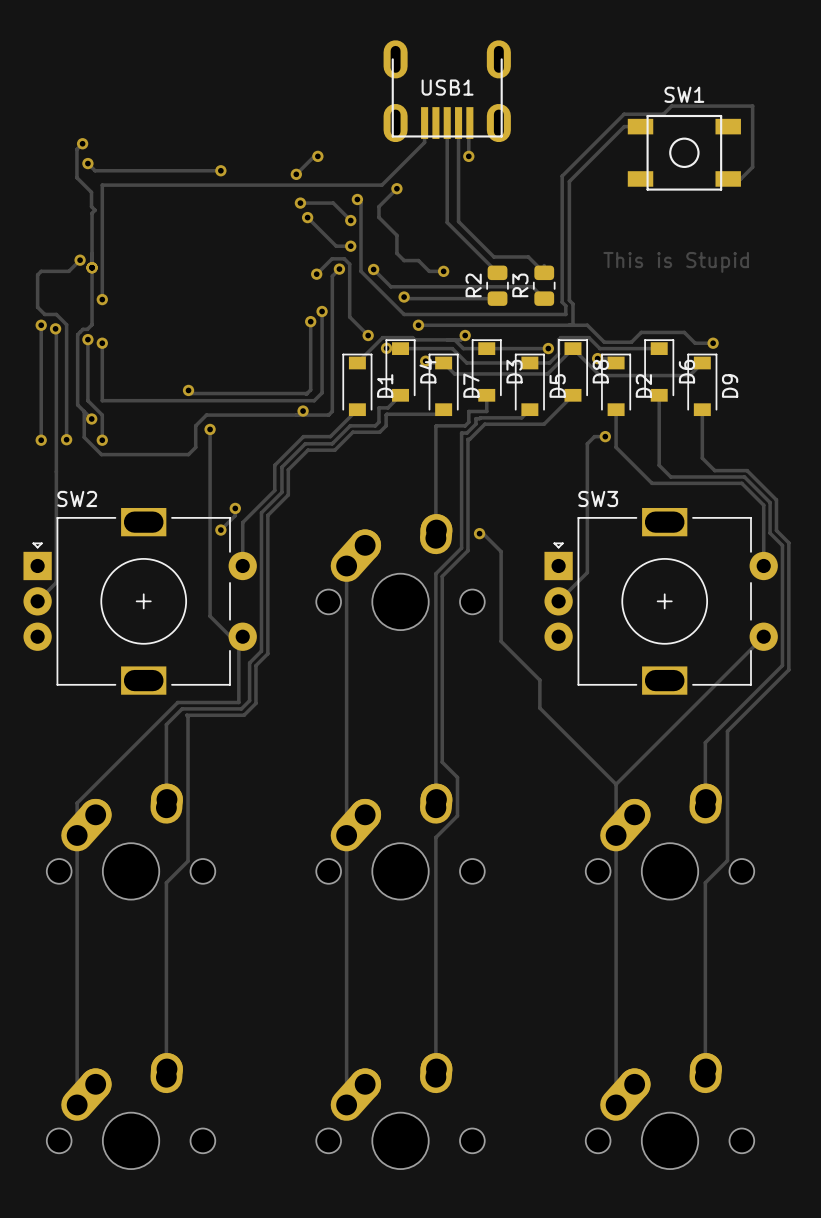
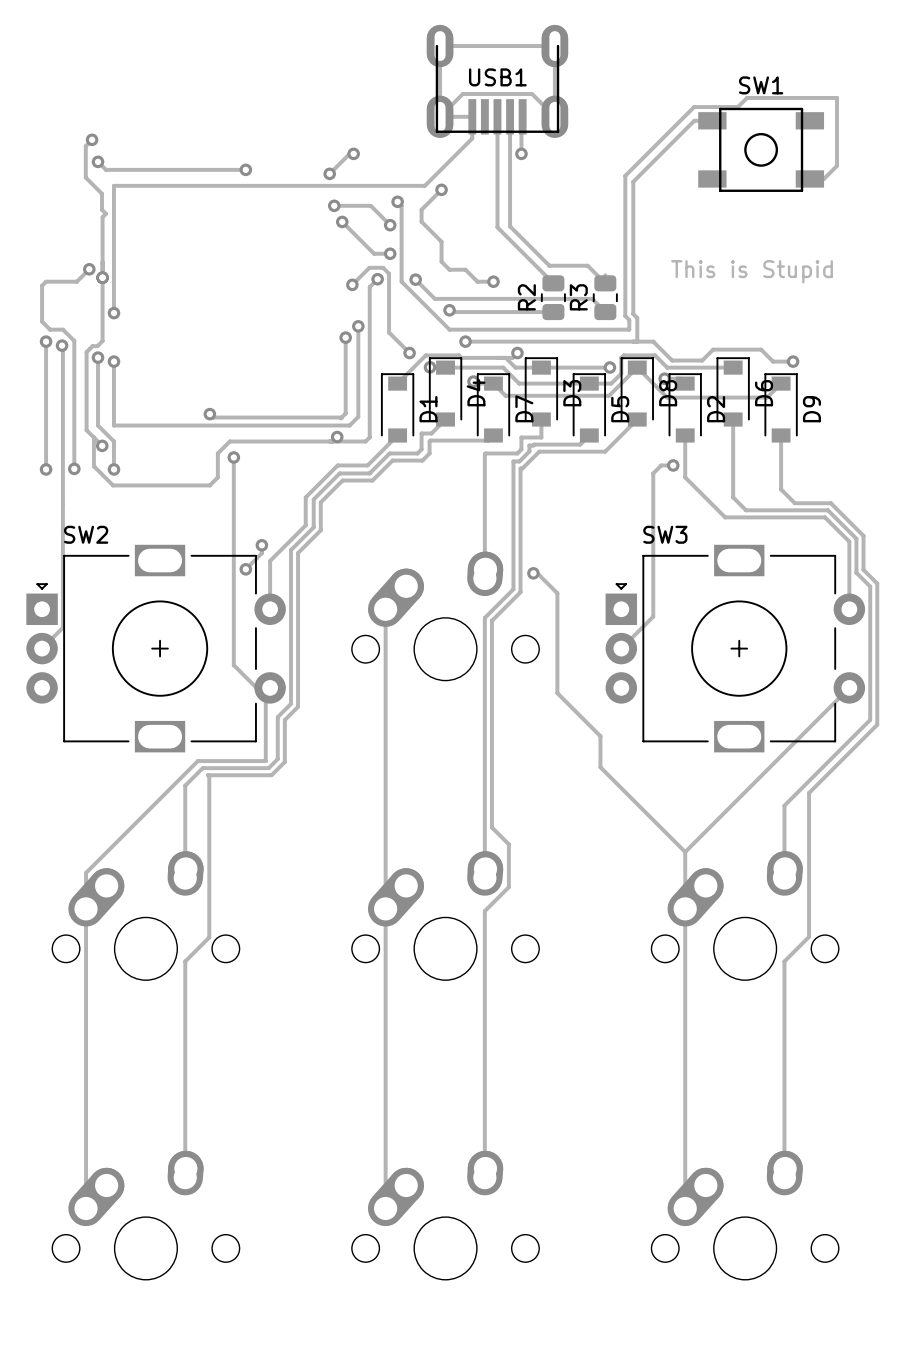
track: none -> (440, 116) (440, 46) (554, 46) (554, 116) (532, 93) (462, 93) (440, 116)
track: none -> (440, 116) (472, 116)

